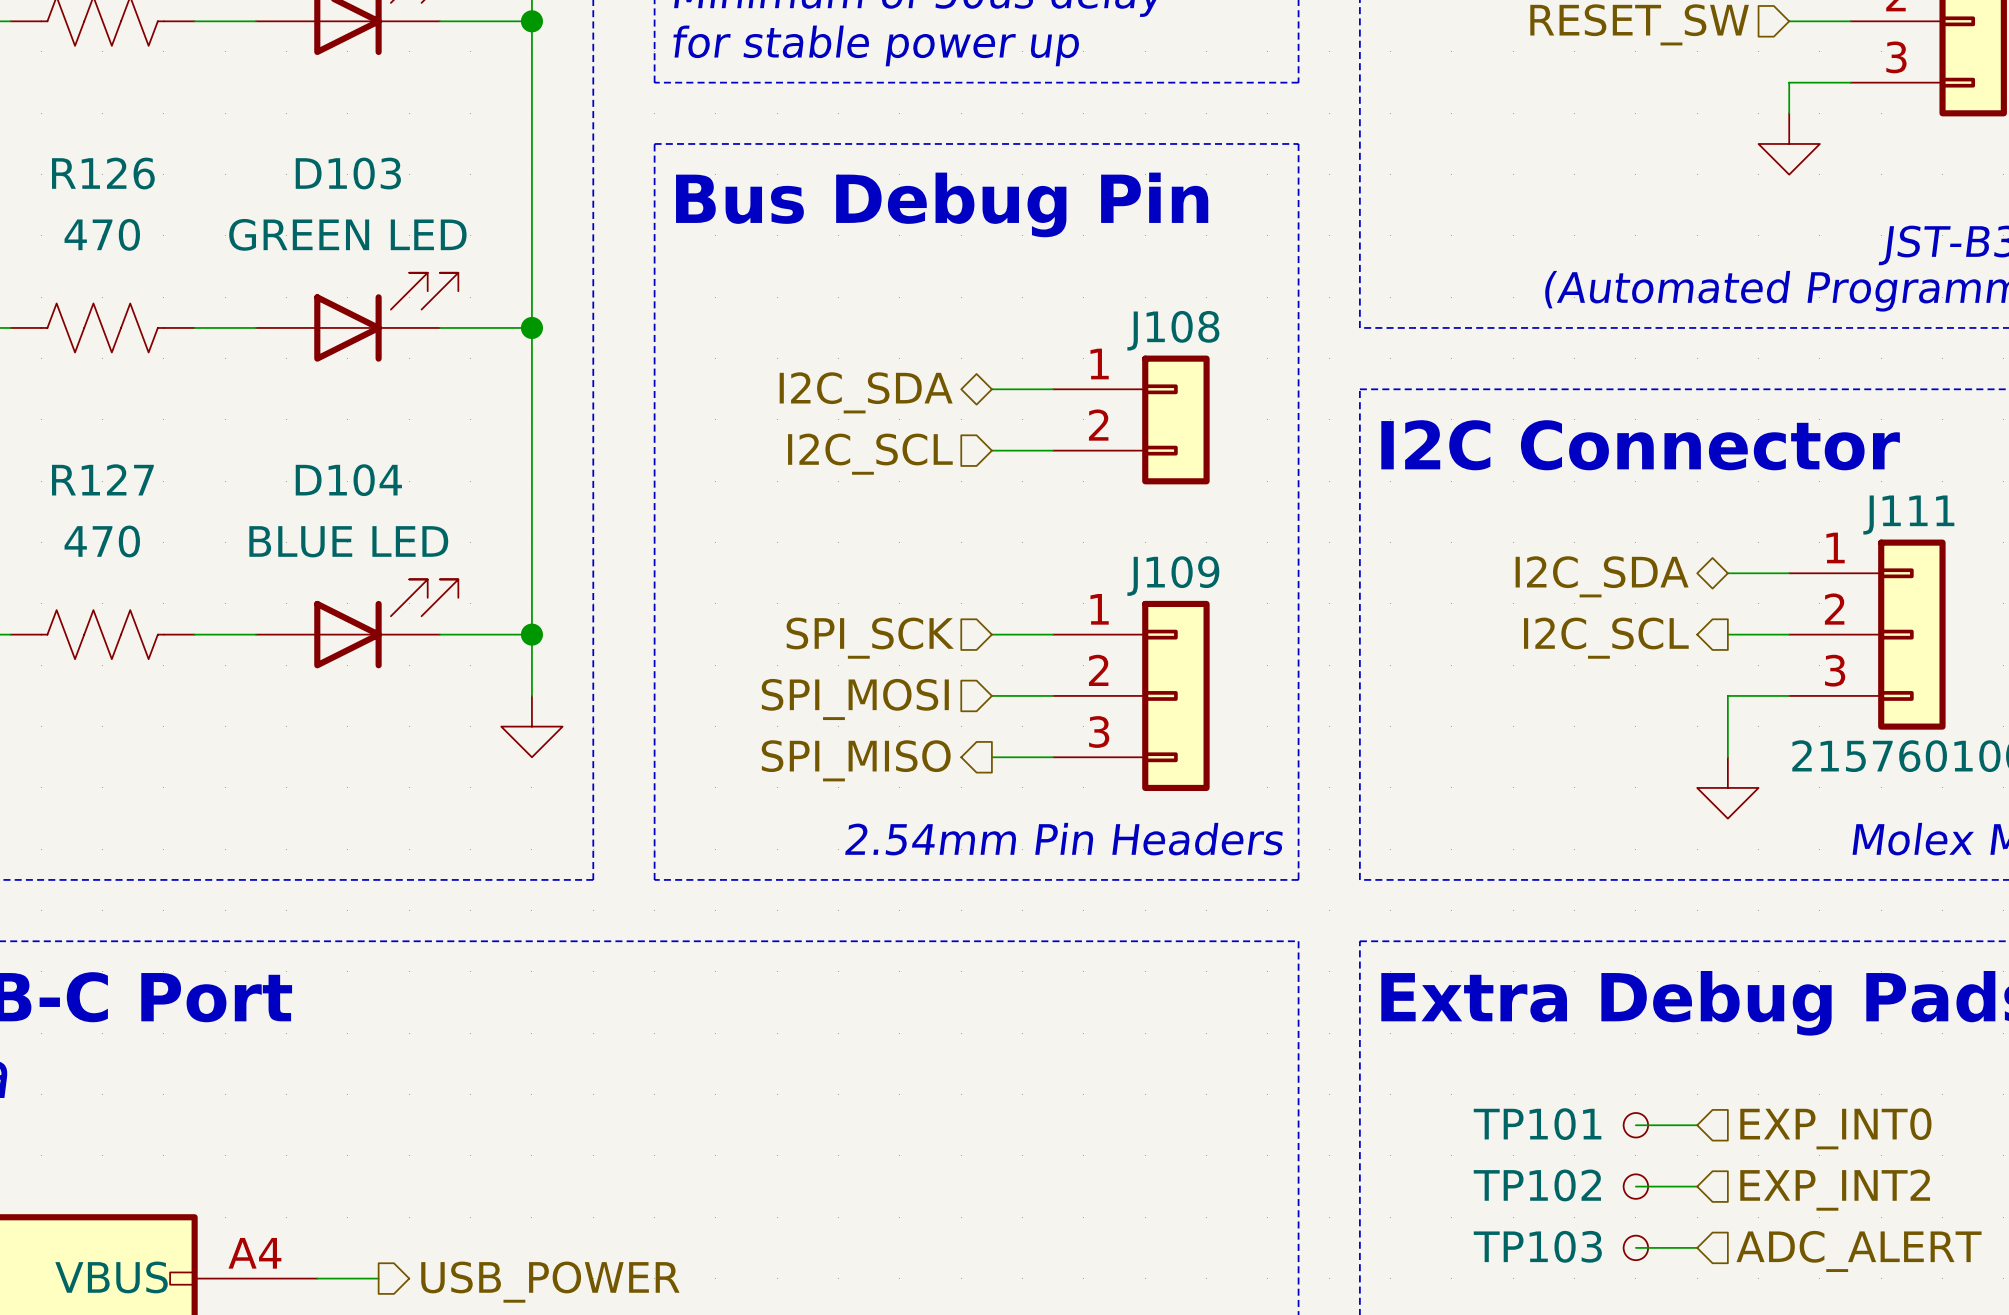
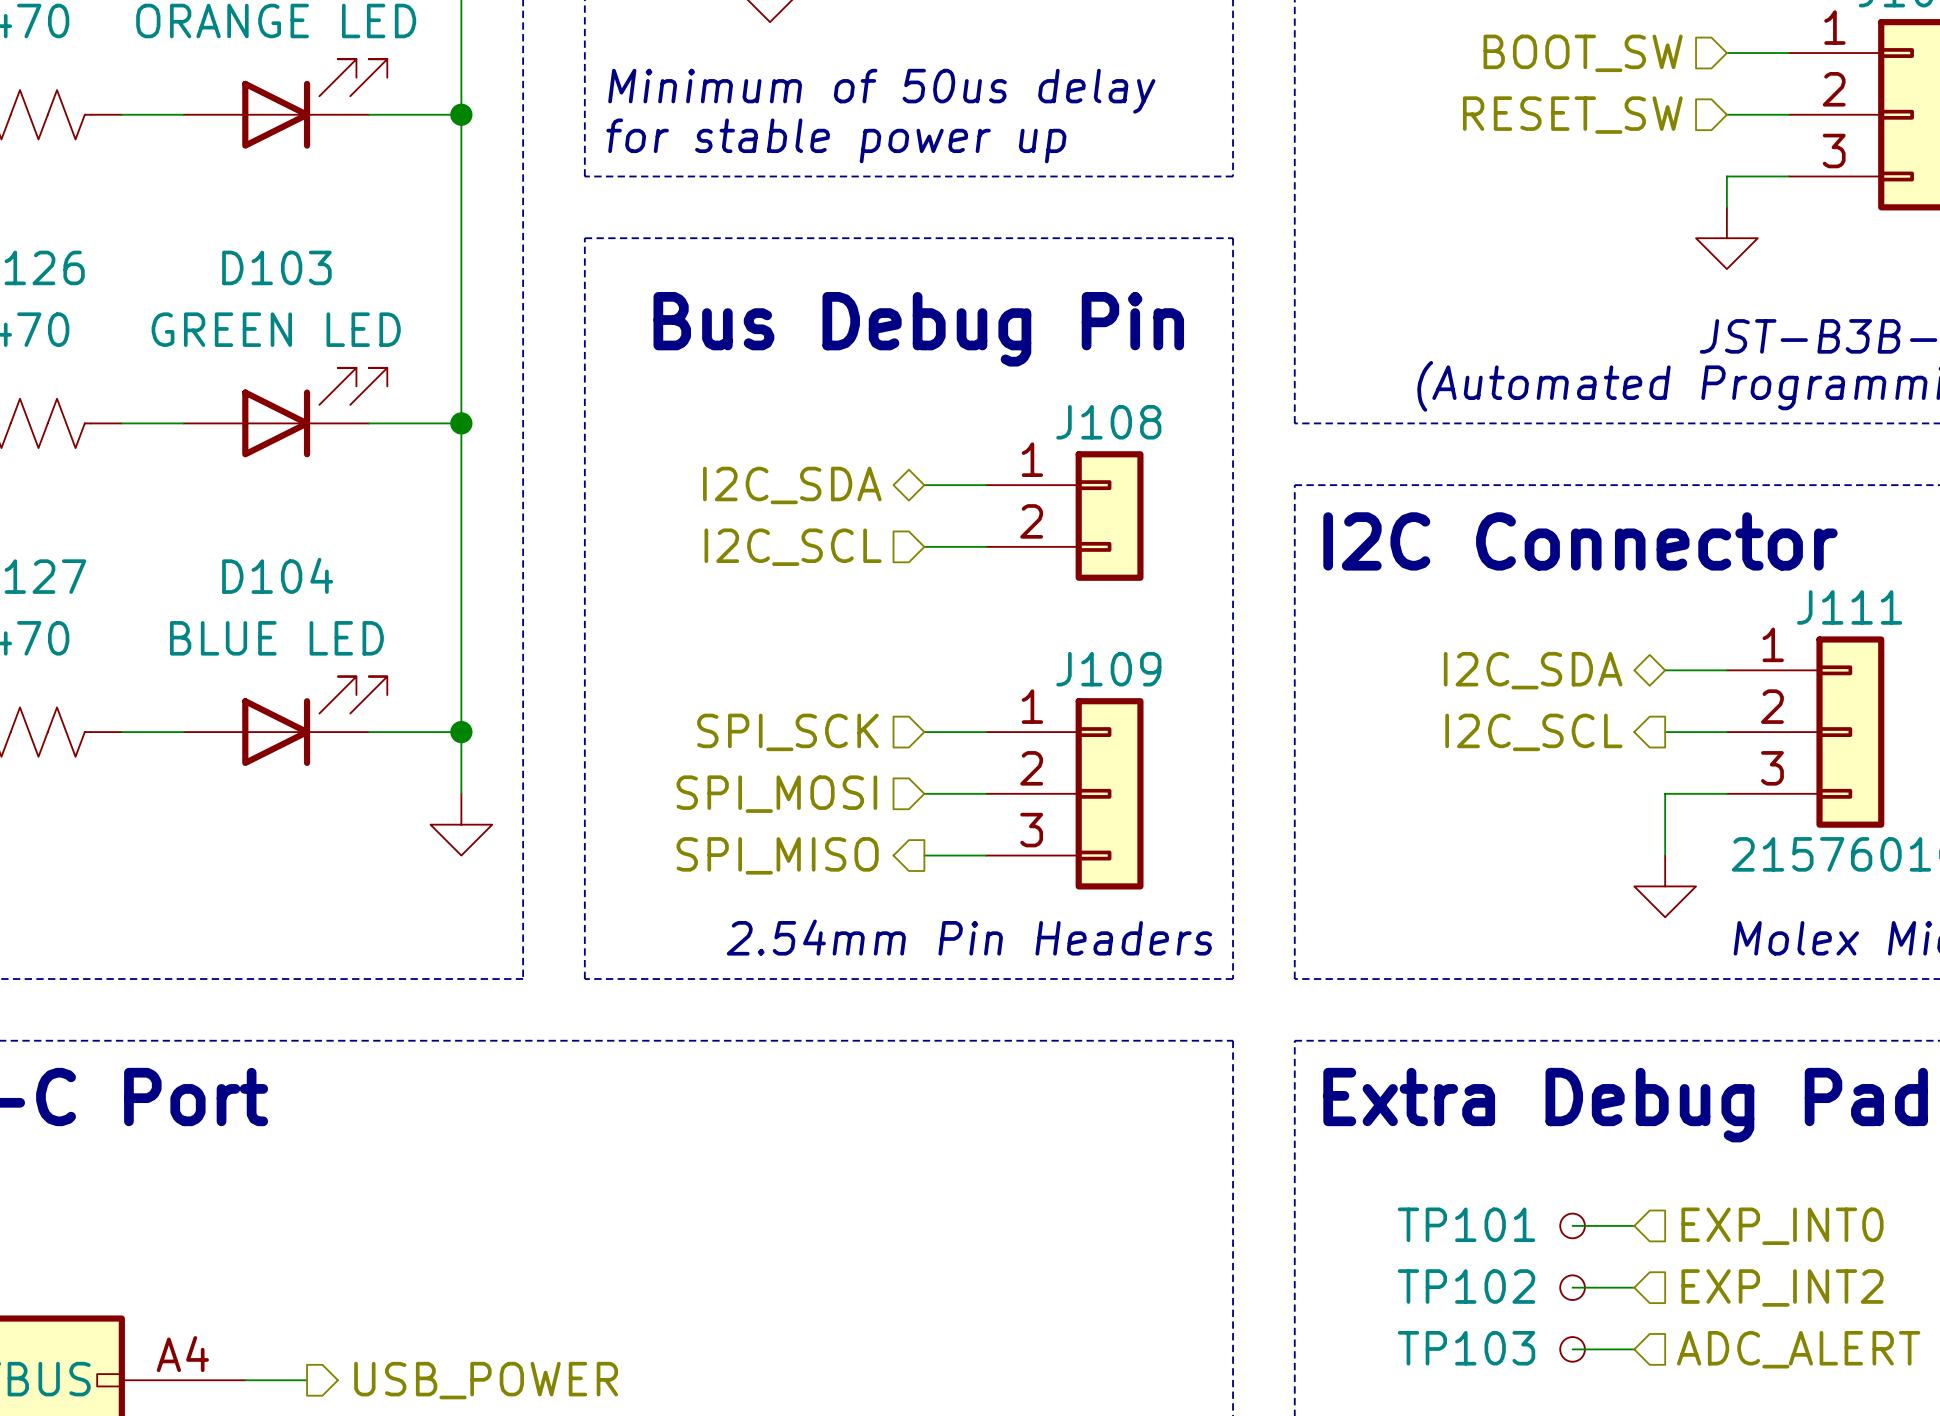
text position: Bus Debug Pin (942, 204) -> Bus Debug Pin (918, 329)

